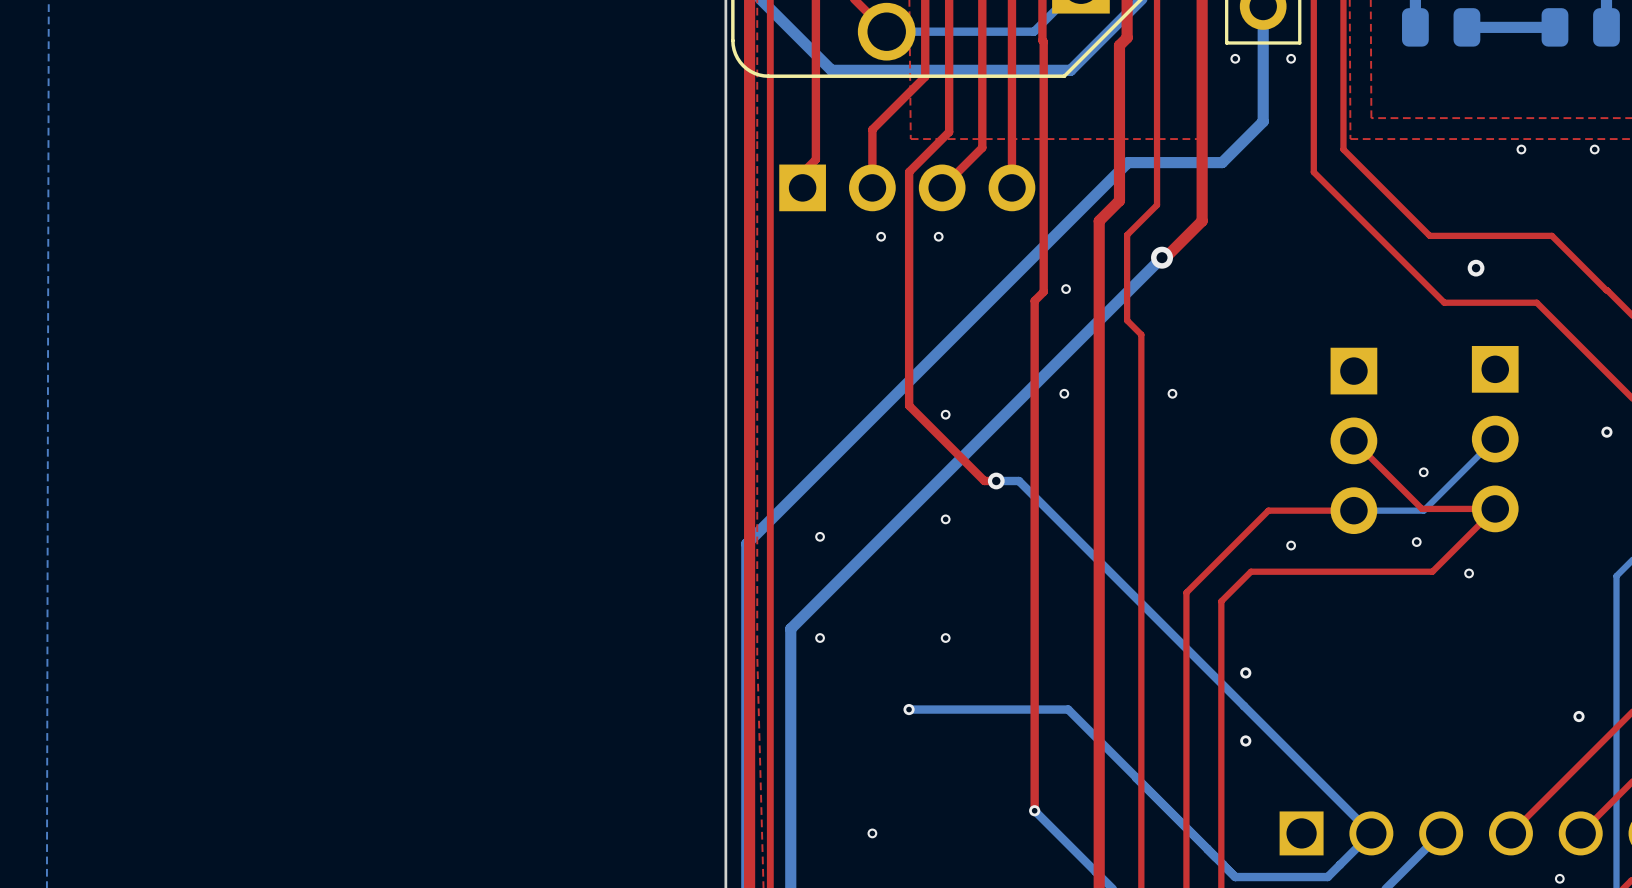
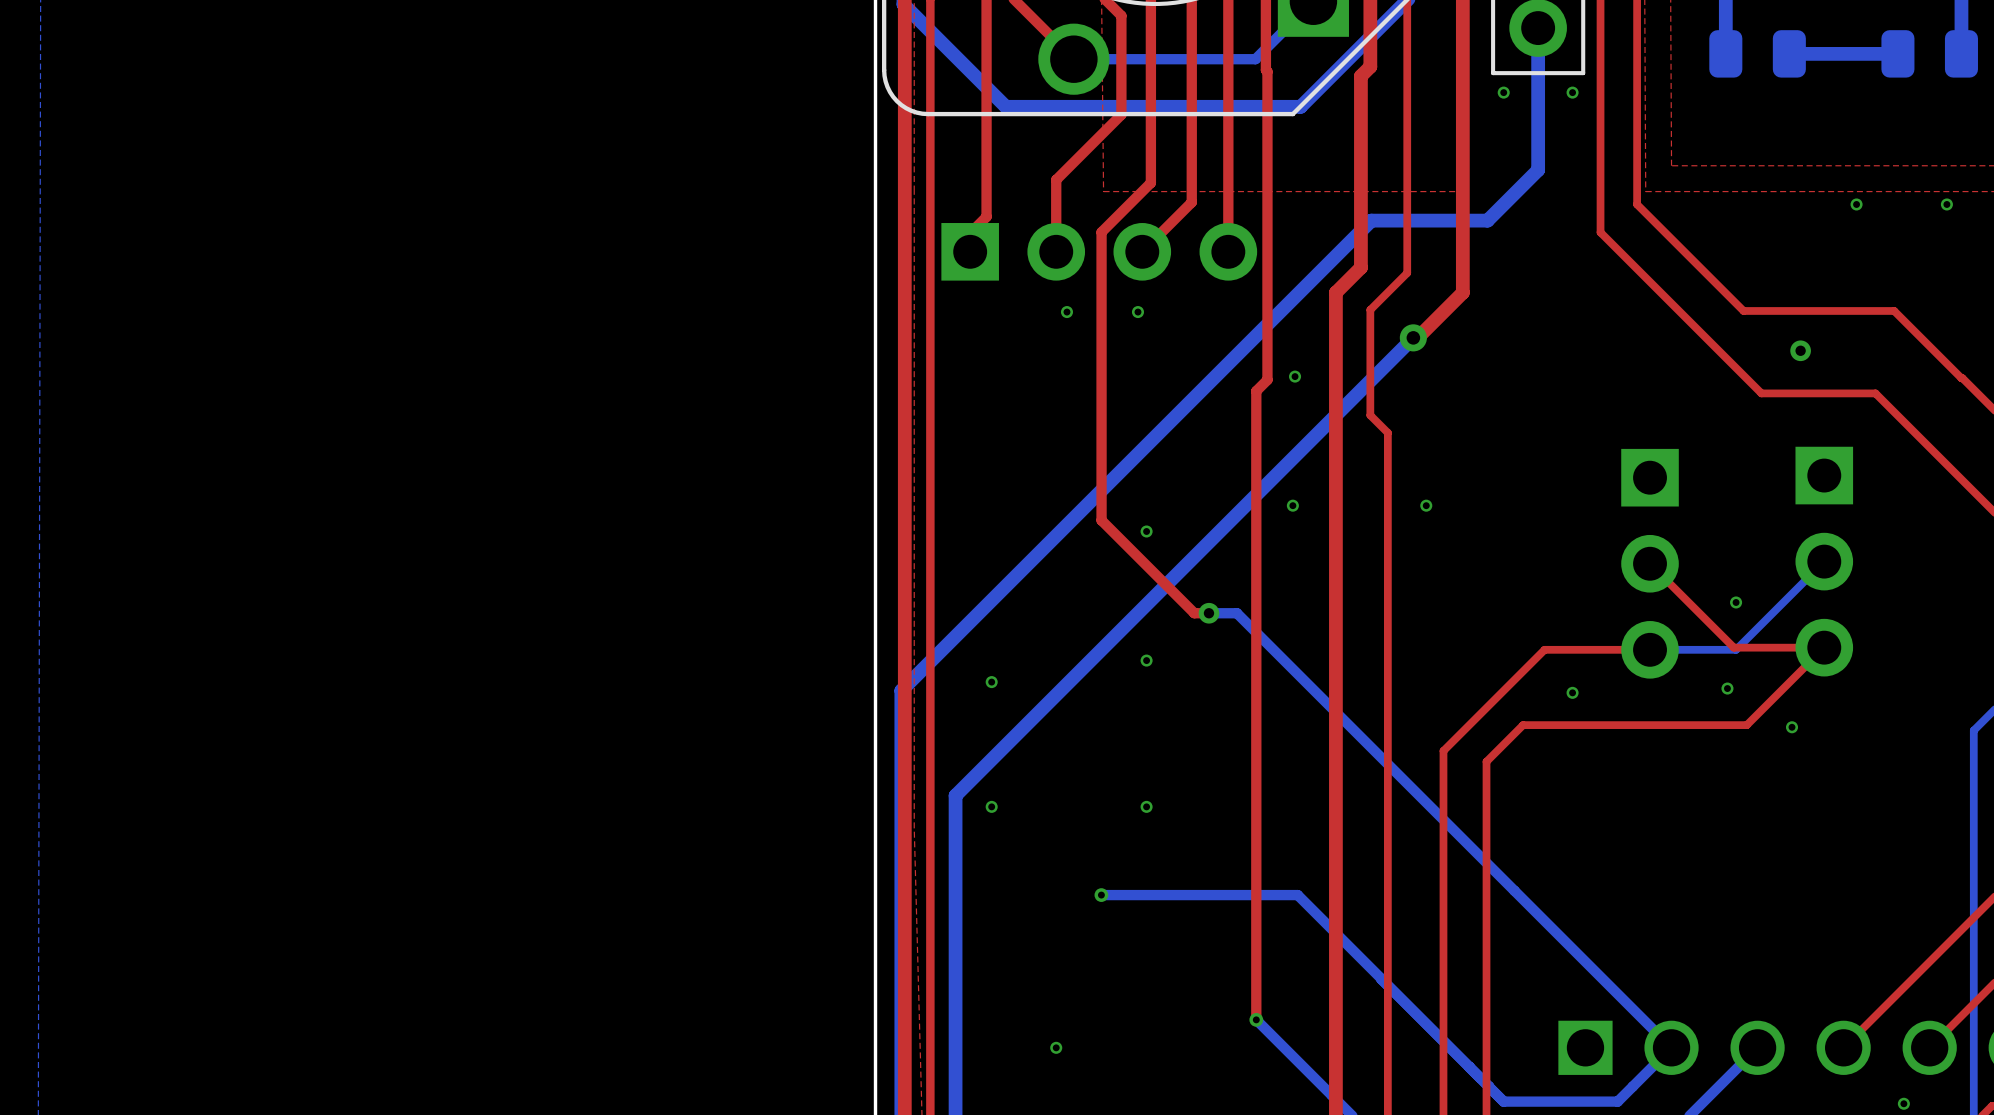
via: (1606, 432) -> none
via: (1245, 672) -> none
via: (1578, 716) -> none
via: (1245, 740) -> none

